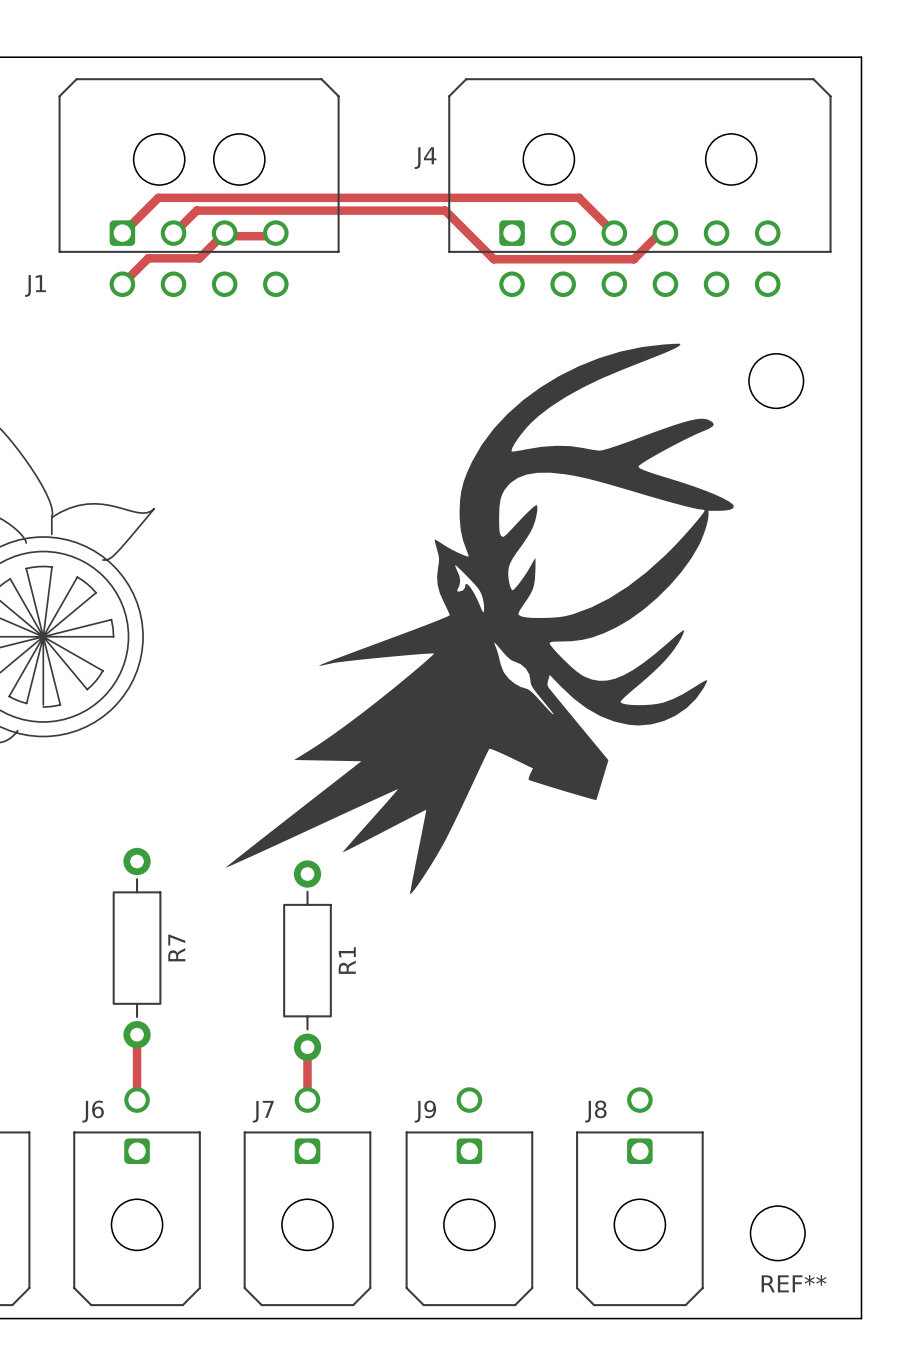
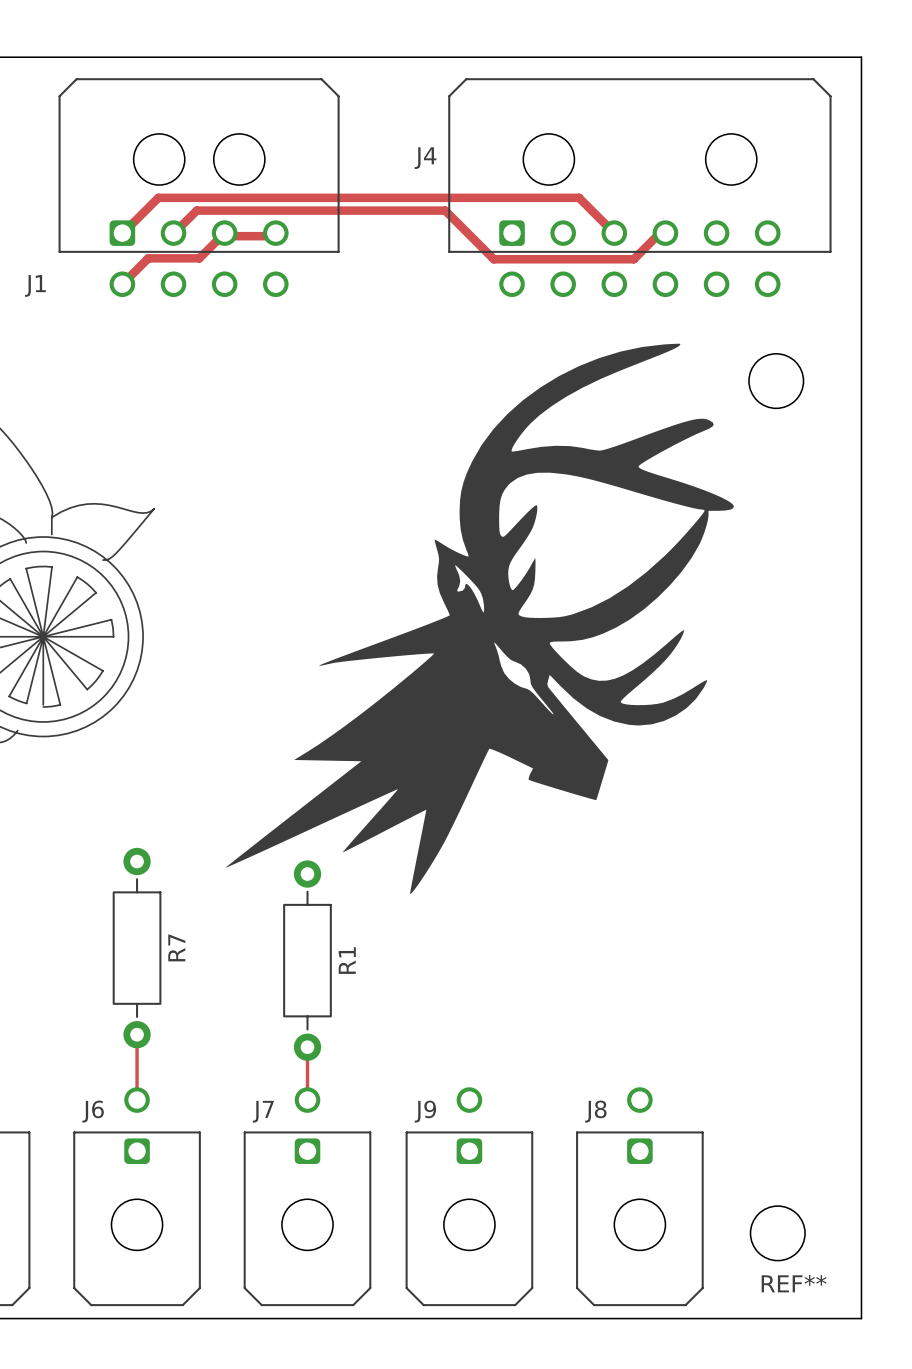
track width: thick (137, 1034) (137, 1091) -> thin (137, 1034) (137, 1091)
track width: thick (307, 1047) (307, 1095) -> thin (307, 1047) (307, 1095)

